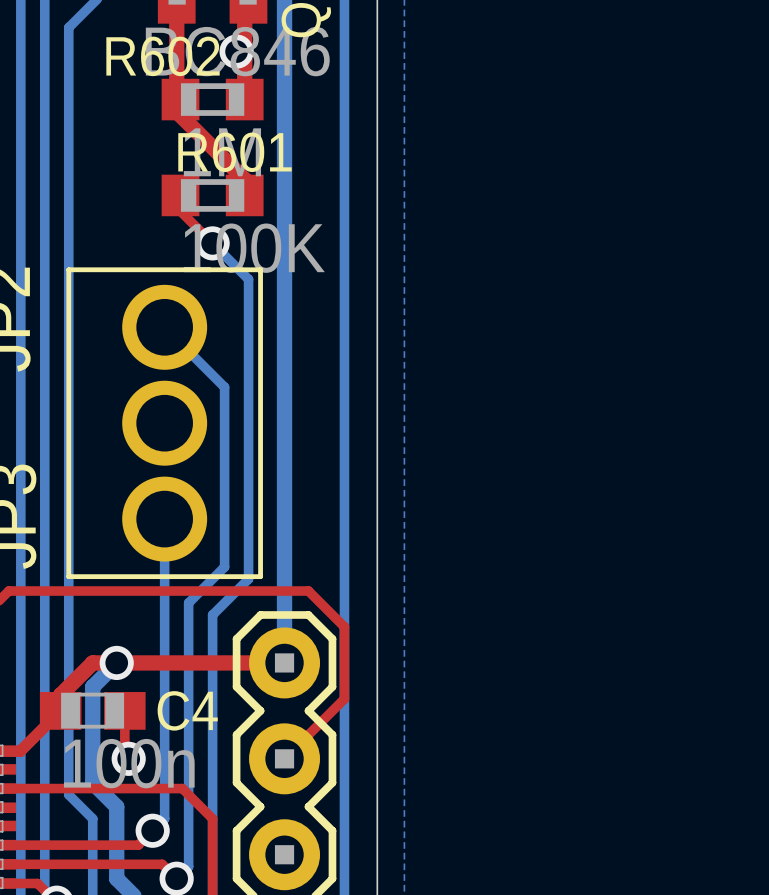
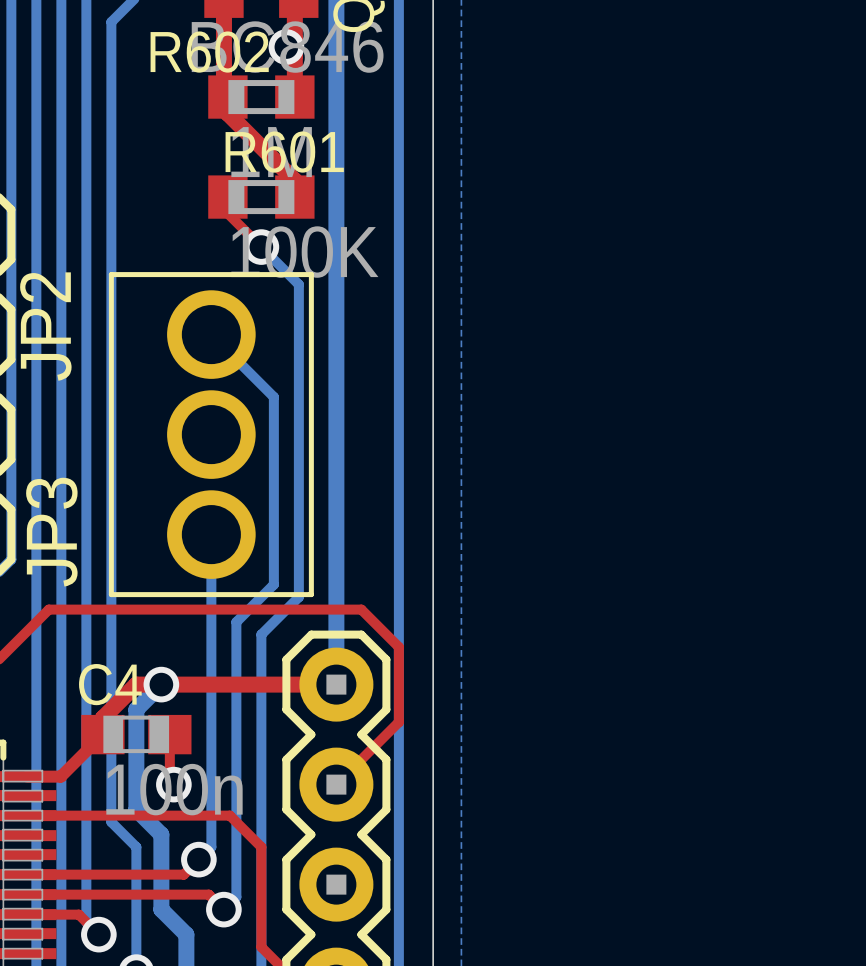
C4 name position: C4 (187, 710) -> C4 (110, 684)

